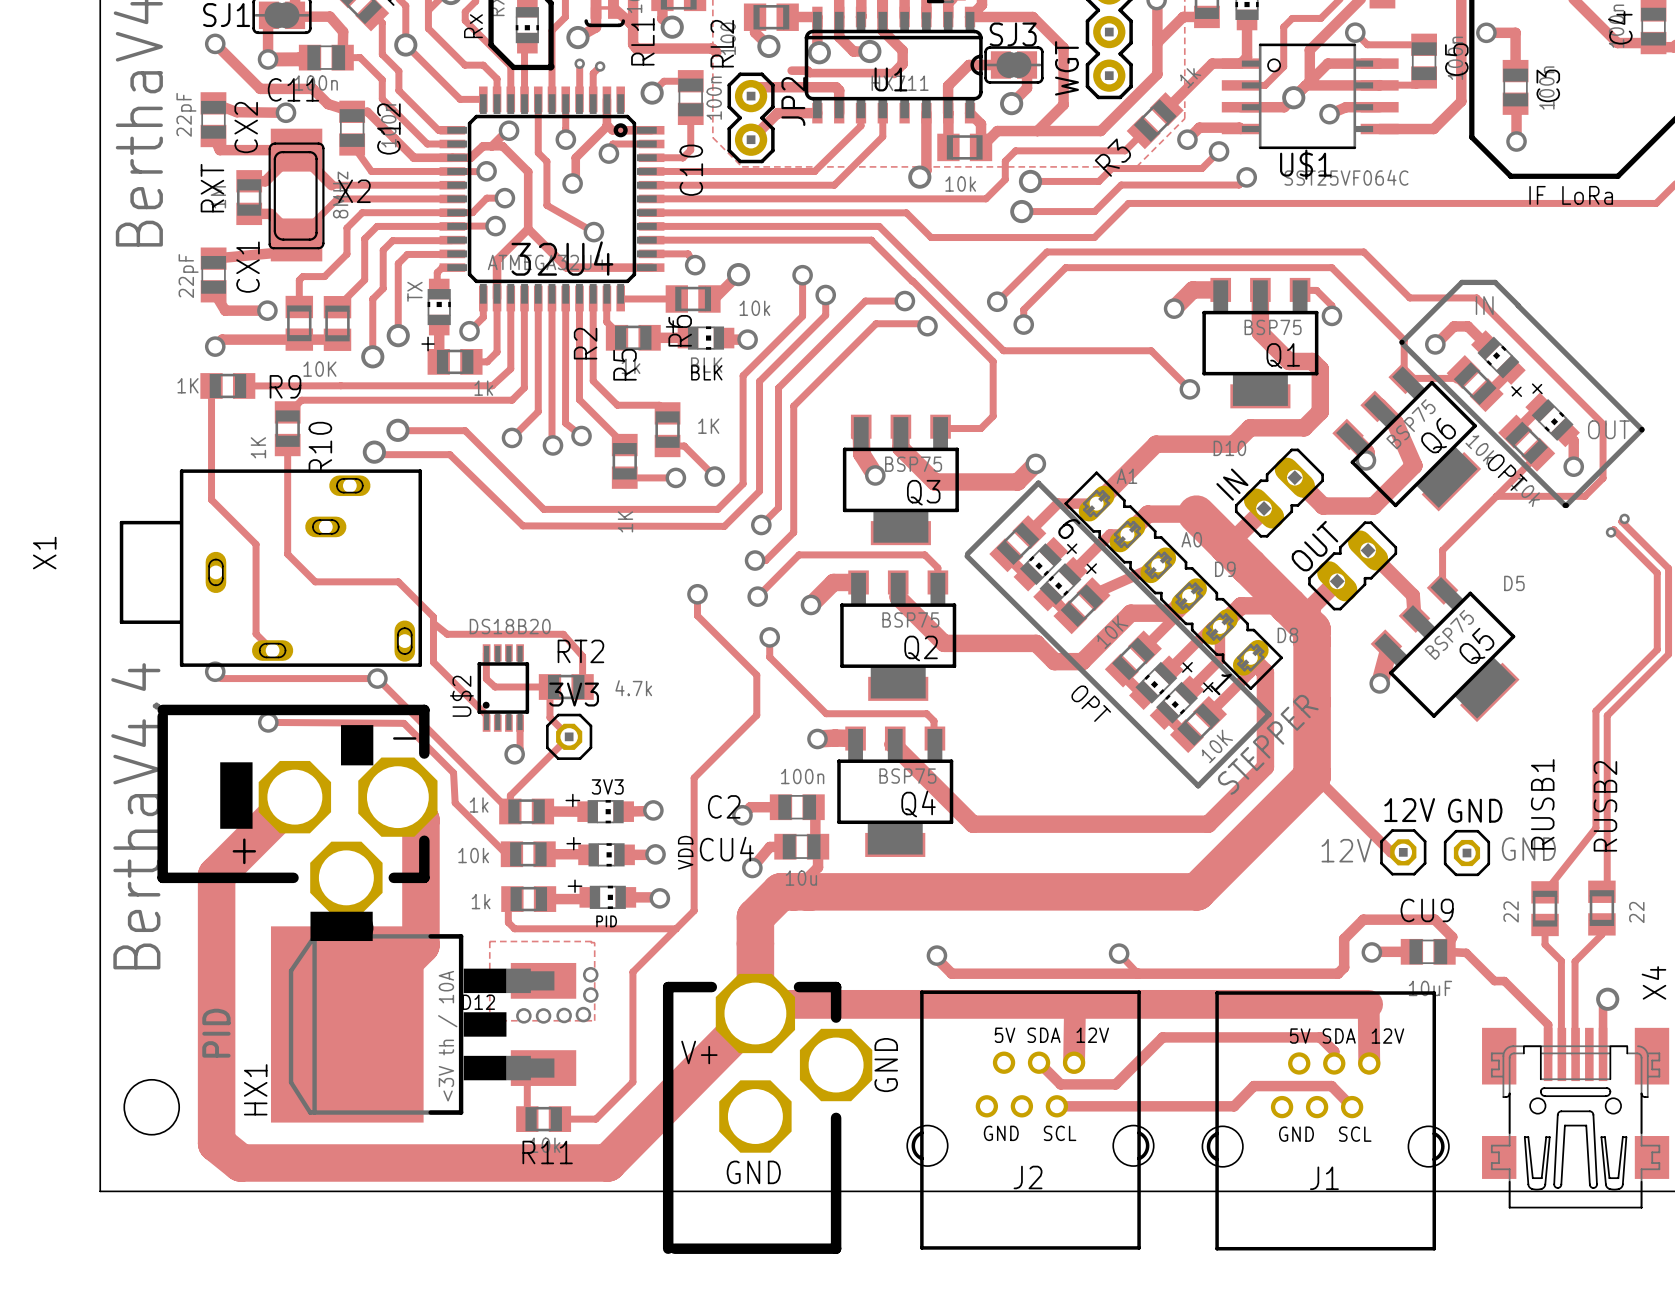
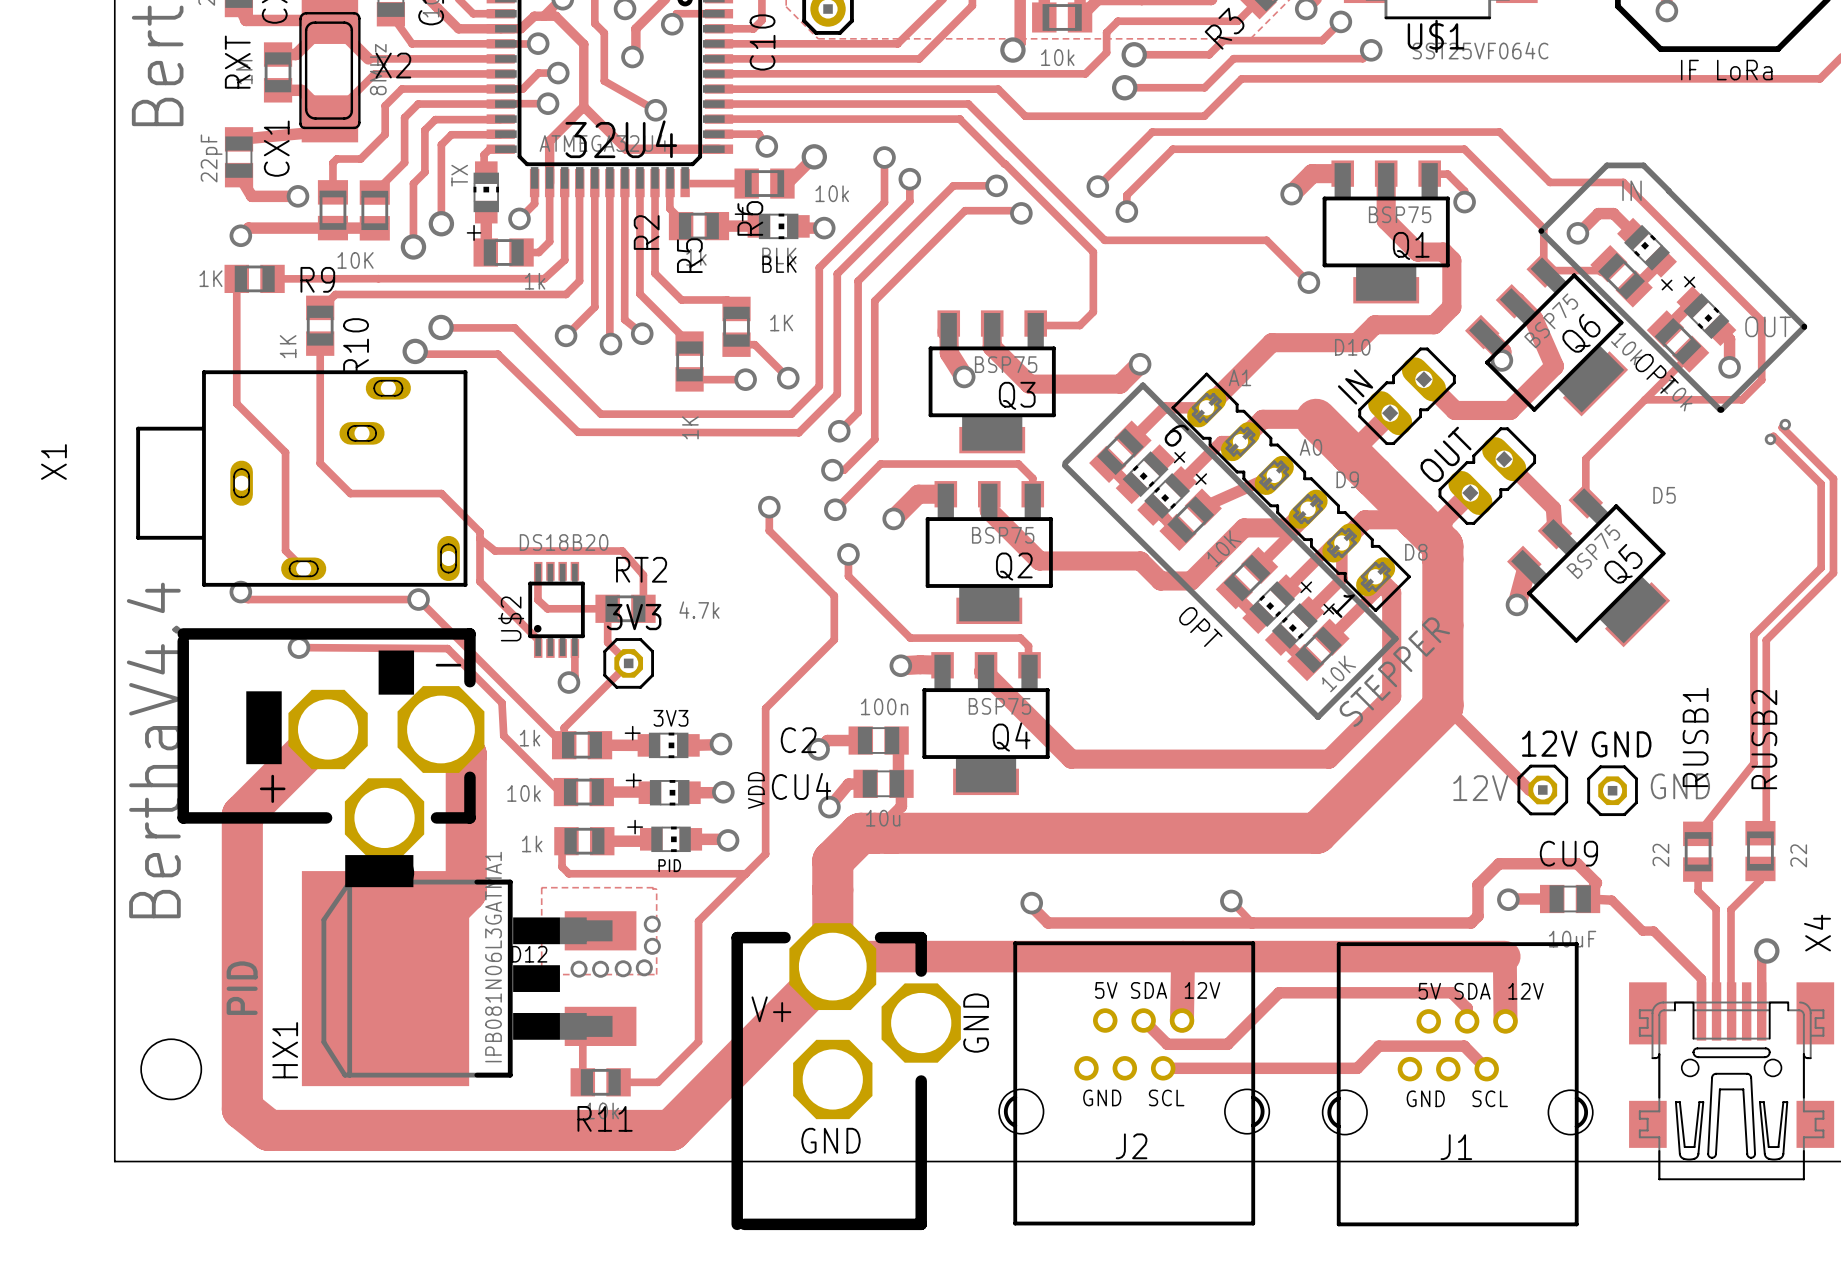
HX1 value: <3V th / 10A (447, 1036) -> IPB081N06L3GATMA1 (493, 957)

